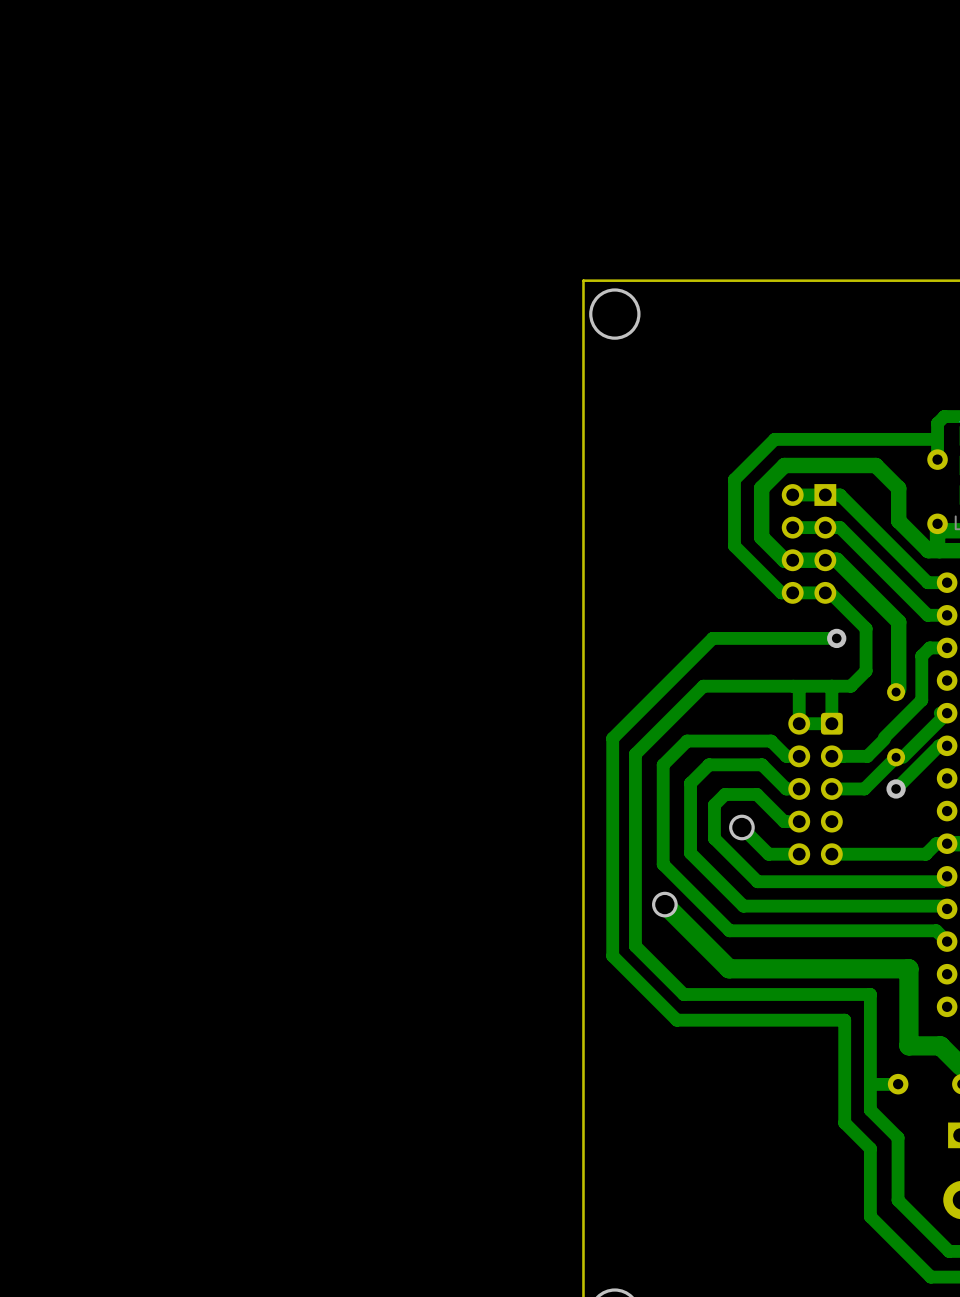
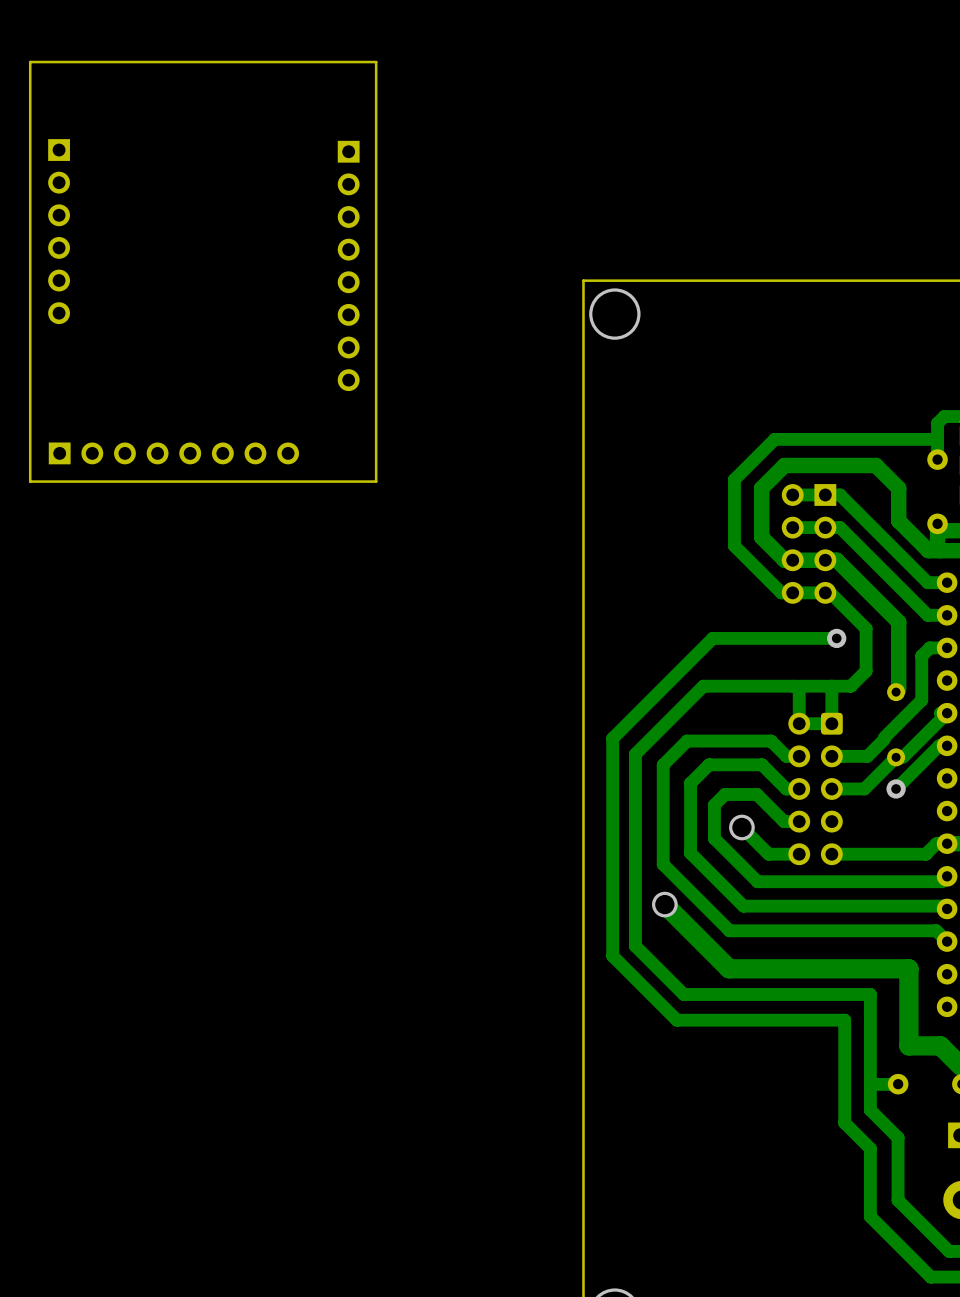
board edge: none -> (376, 62) (30, 62) (30, 481) (376, 481) (376, 62)
part: none -> (59, 231)
part: none -> (348, 265)
part: none -> (173, 453)

